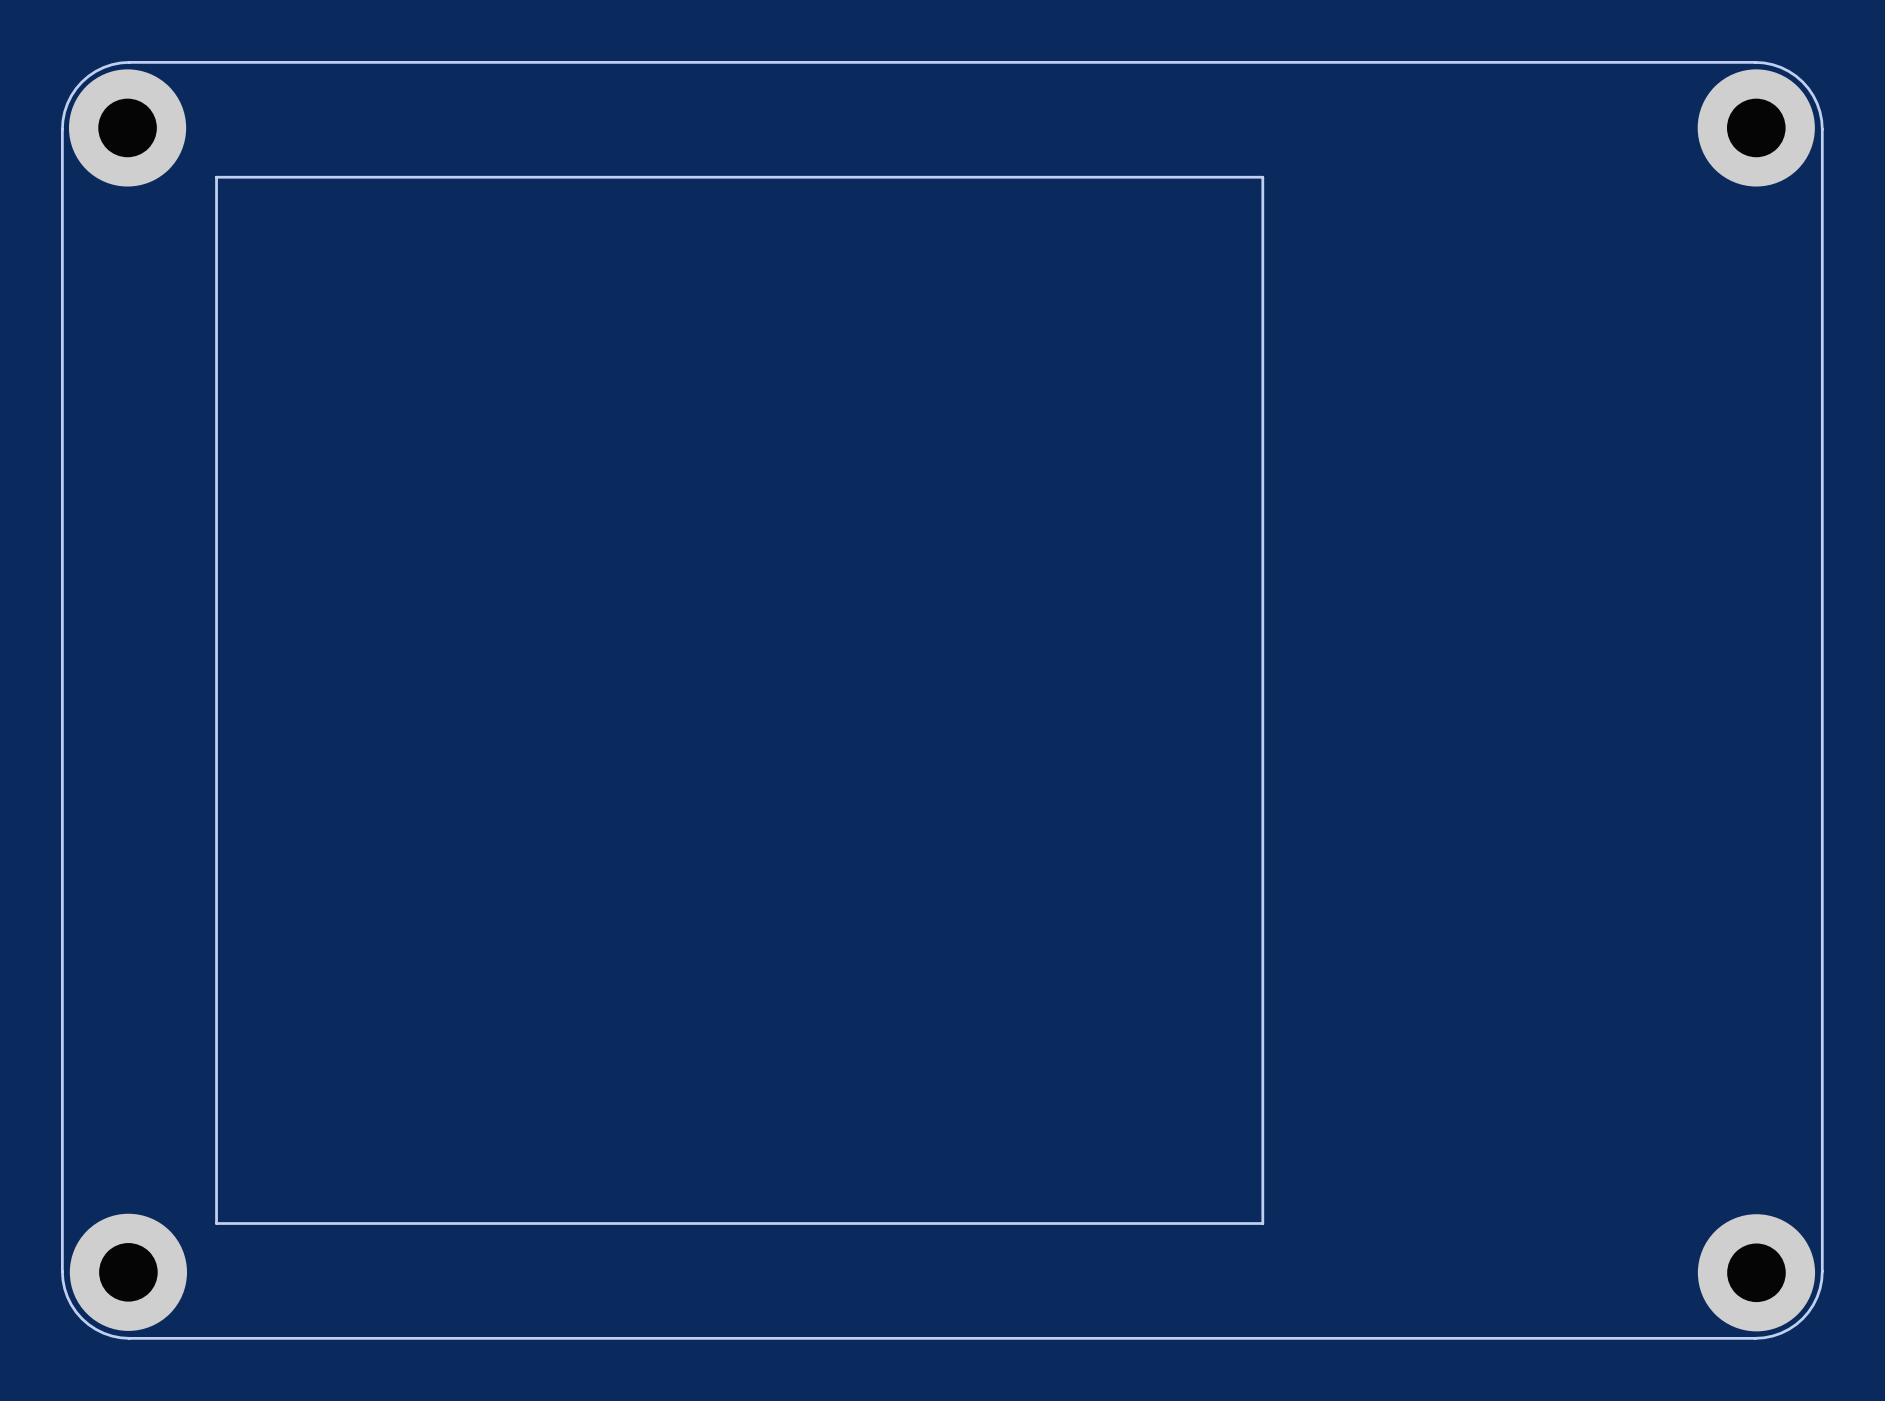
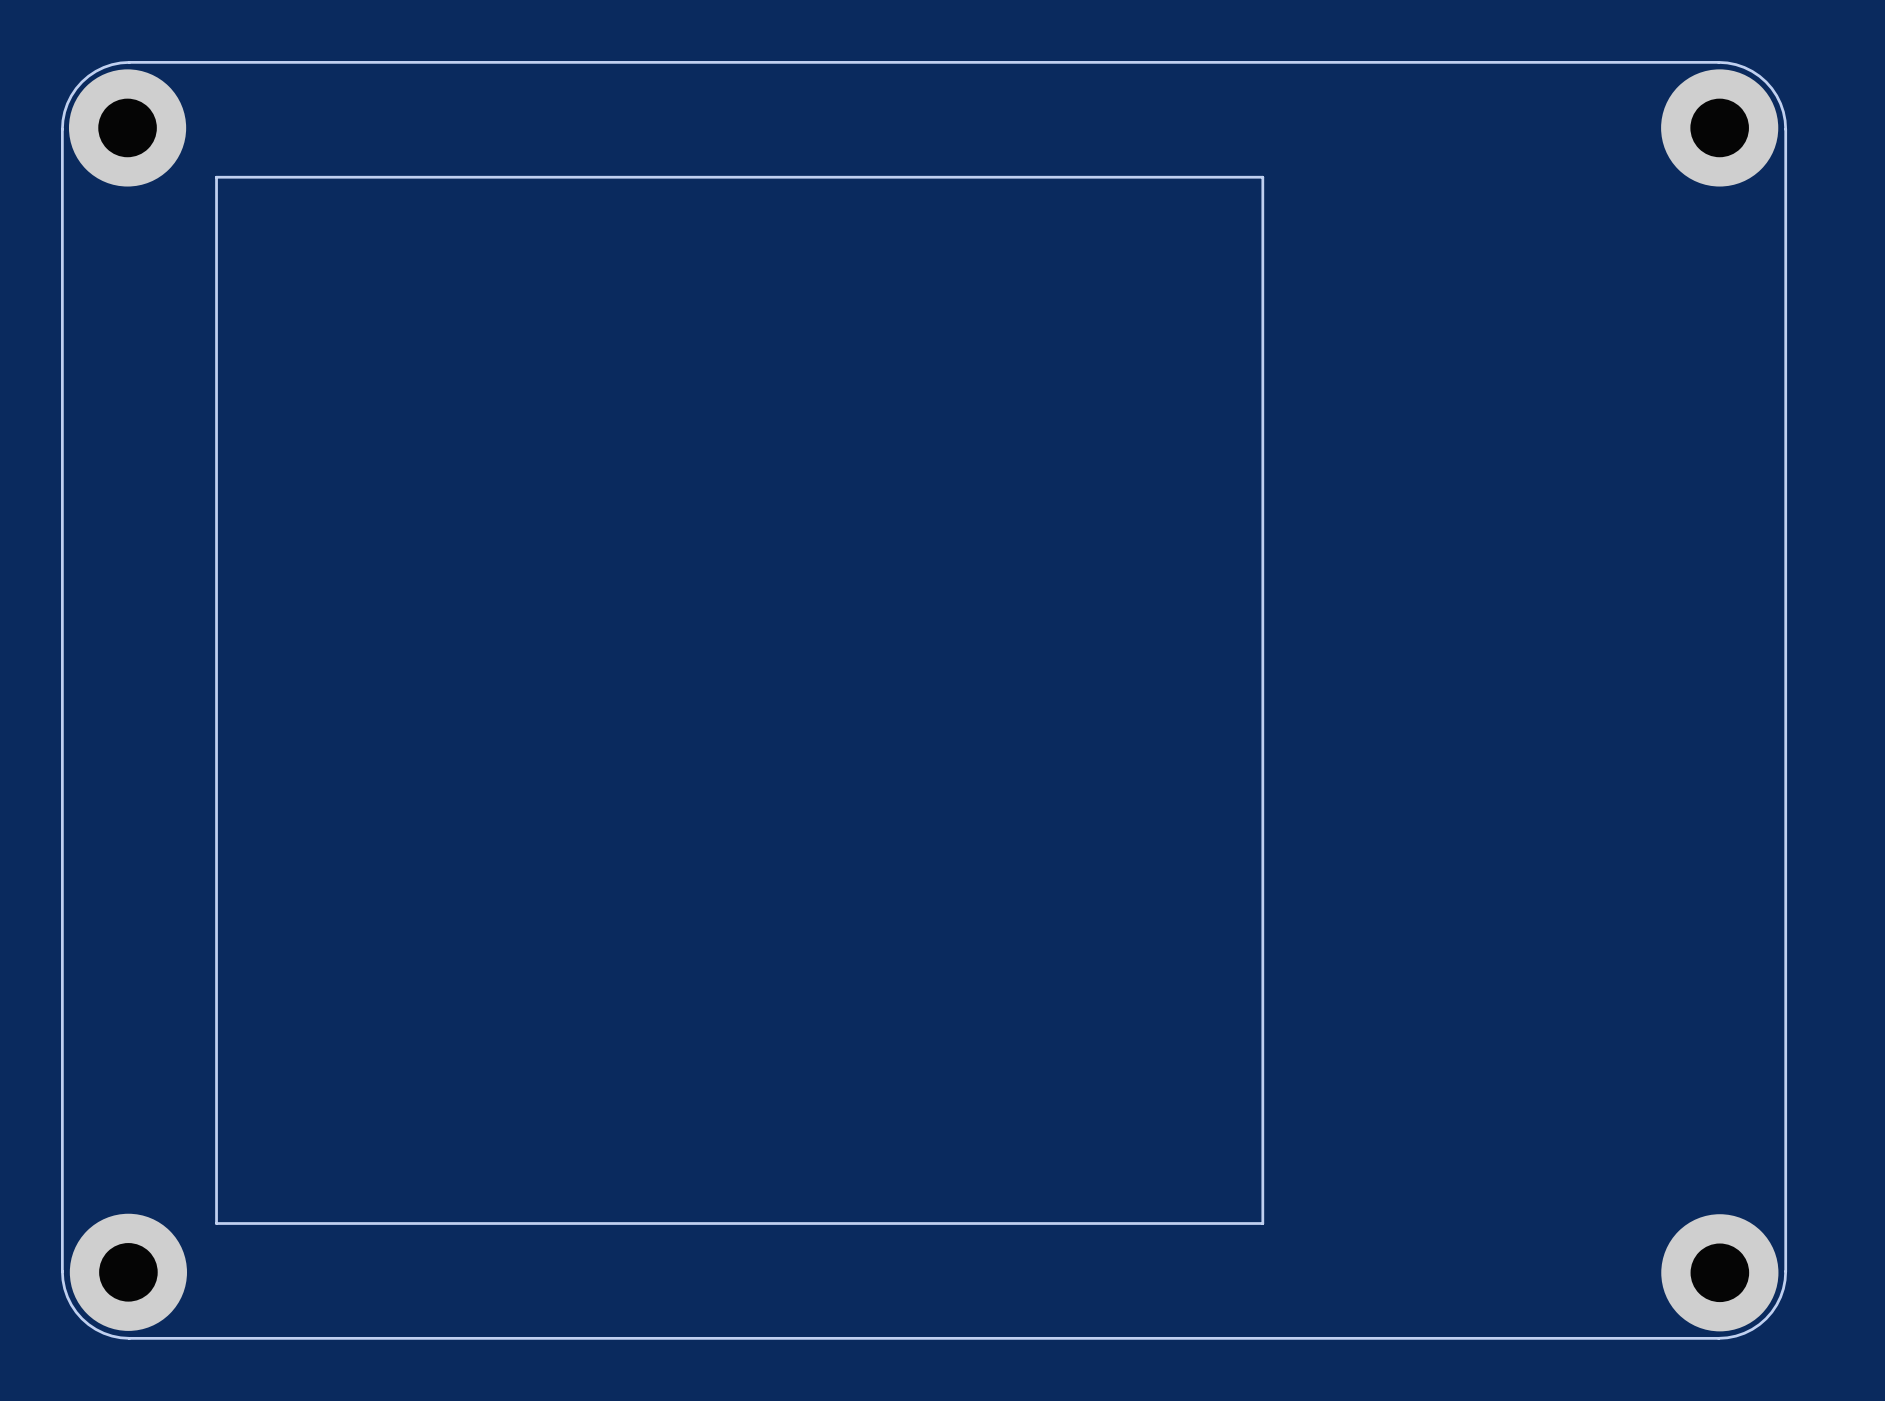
board edge: (1718, 62) (1764, 62) (1788, 71) (1802, 81) (1813, 95) (1820, 112) (1822, 129) (1821, 1280) (1813, 1304) (1802, 1318) (1788, 1329) (1764, 1337) (1718, 1338) -> (1718, 62) (1744, 67) (1766, 81) (1780, 103) (1785, 129) (1785, 1271) (1780, 1297) (1766, 1318) (1744, 1333) (1718, 1338)
part position: (1756, 127) -> (1719, 127)
part position: (1756, 1272) -> (1719, 1272)

